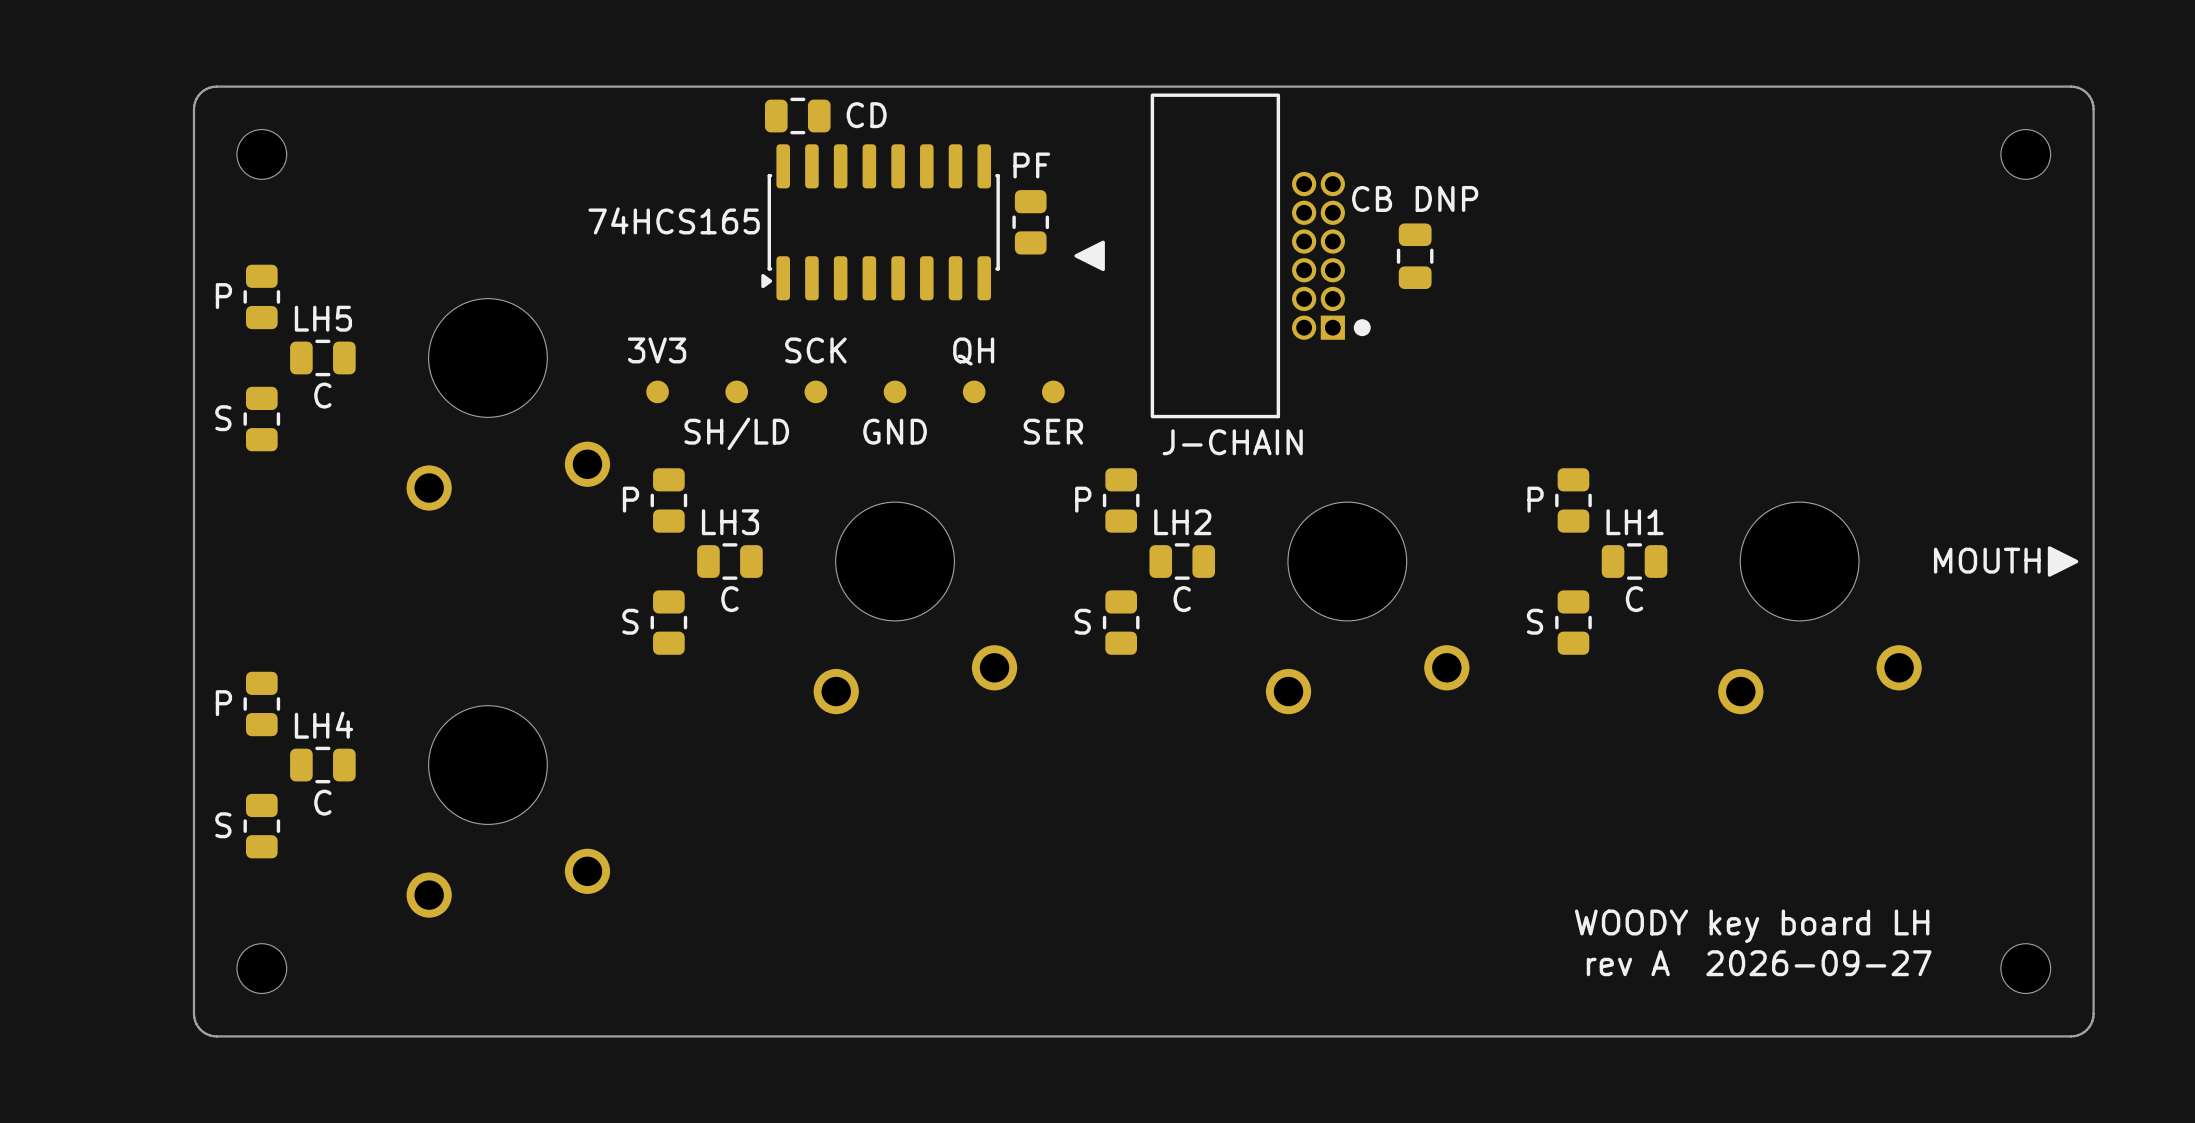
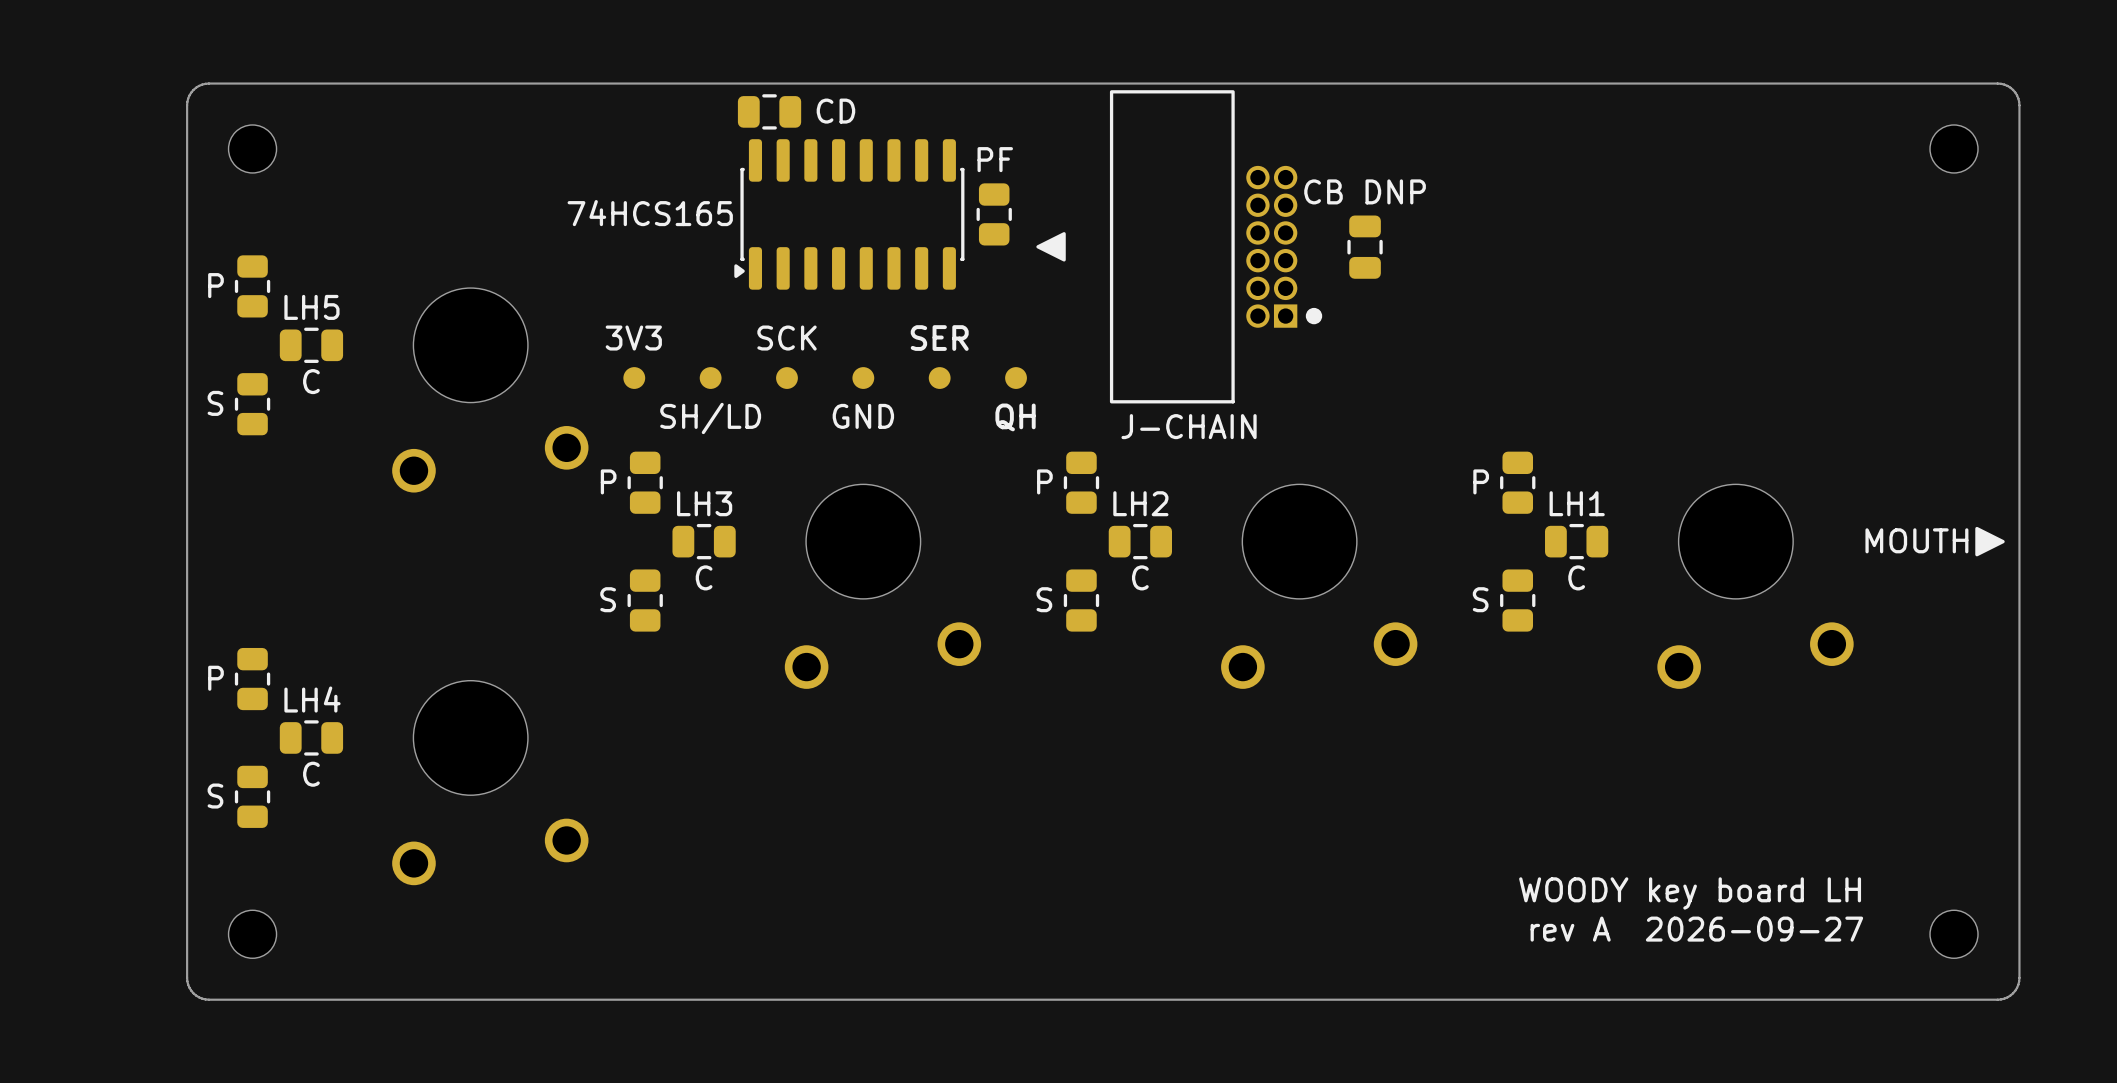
text: QH (973, 351) -> SER (939, 338)
text: SER (1053, 431) -> QH (1015, 417)

